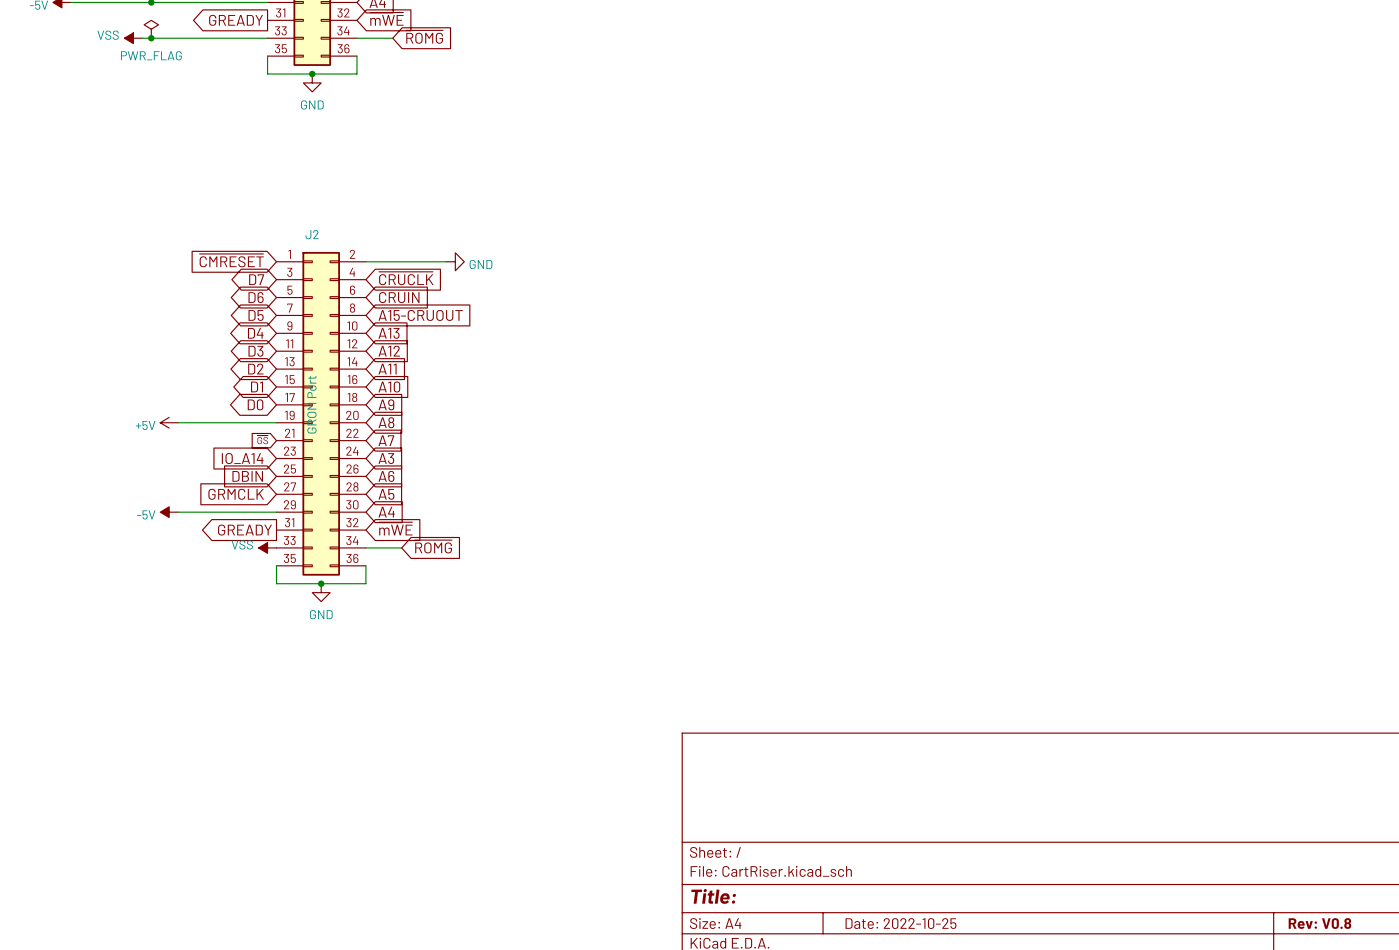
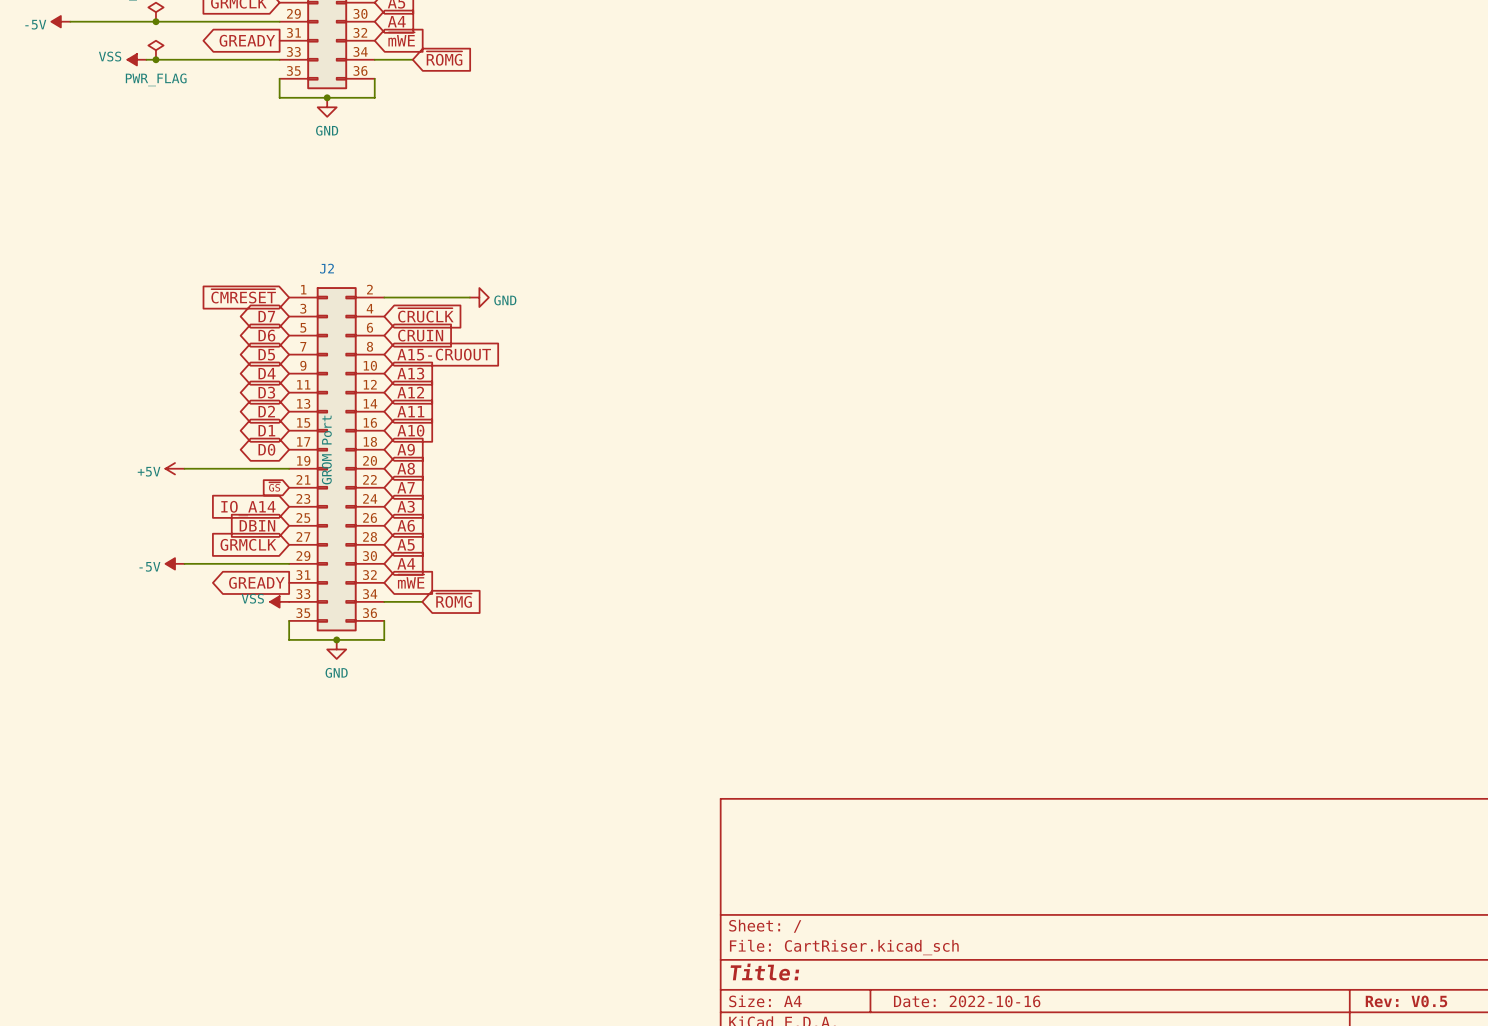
title block: Date: 2022-10-25 (901, 923) -> Date: 2022-10-16 (967, 1001)
title block: Rev: V0.8 (1319, 923) -> Rev: V0.5 (1406, 1001)

